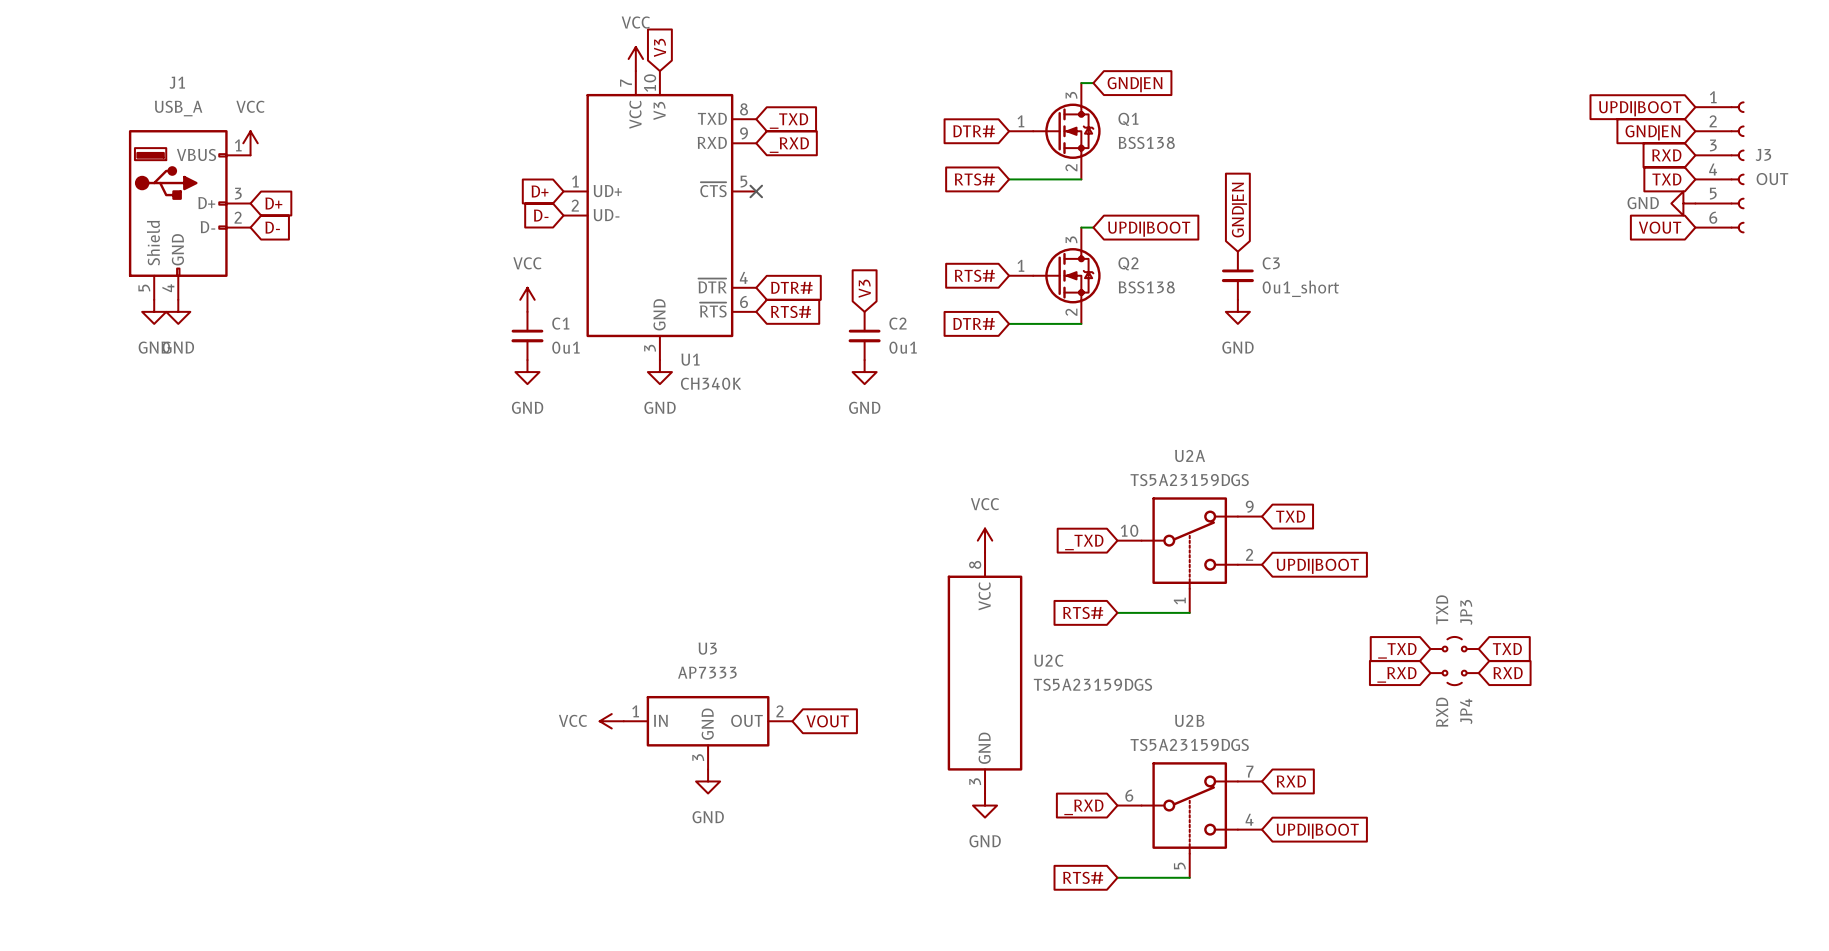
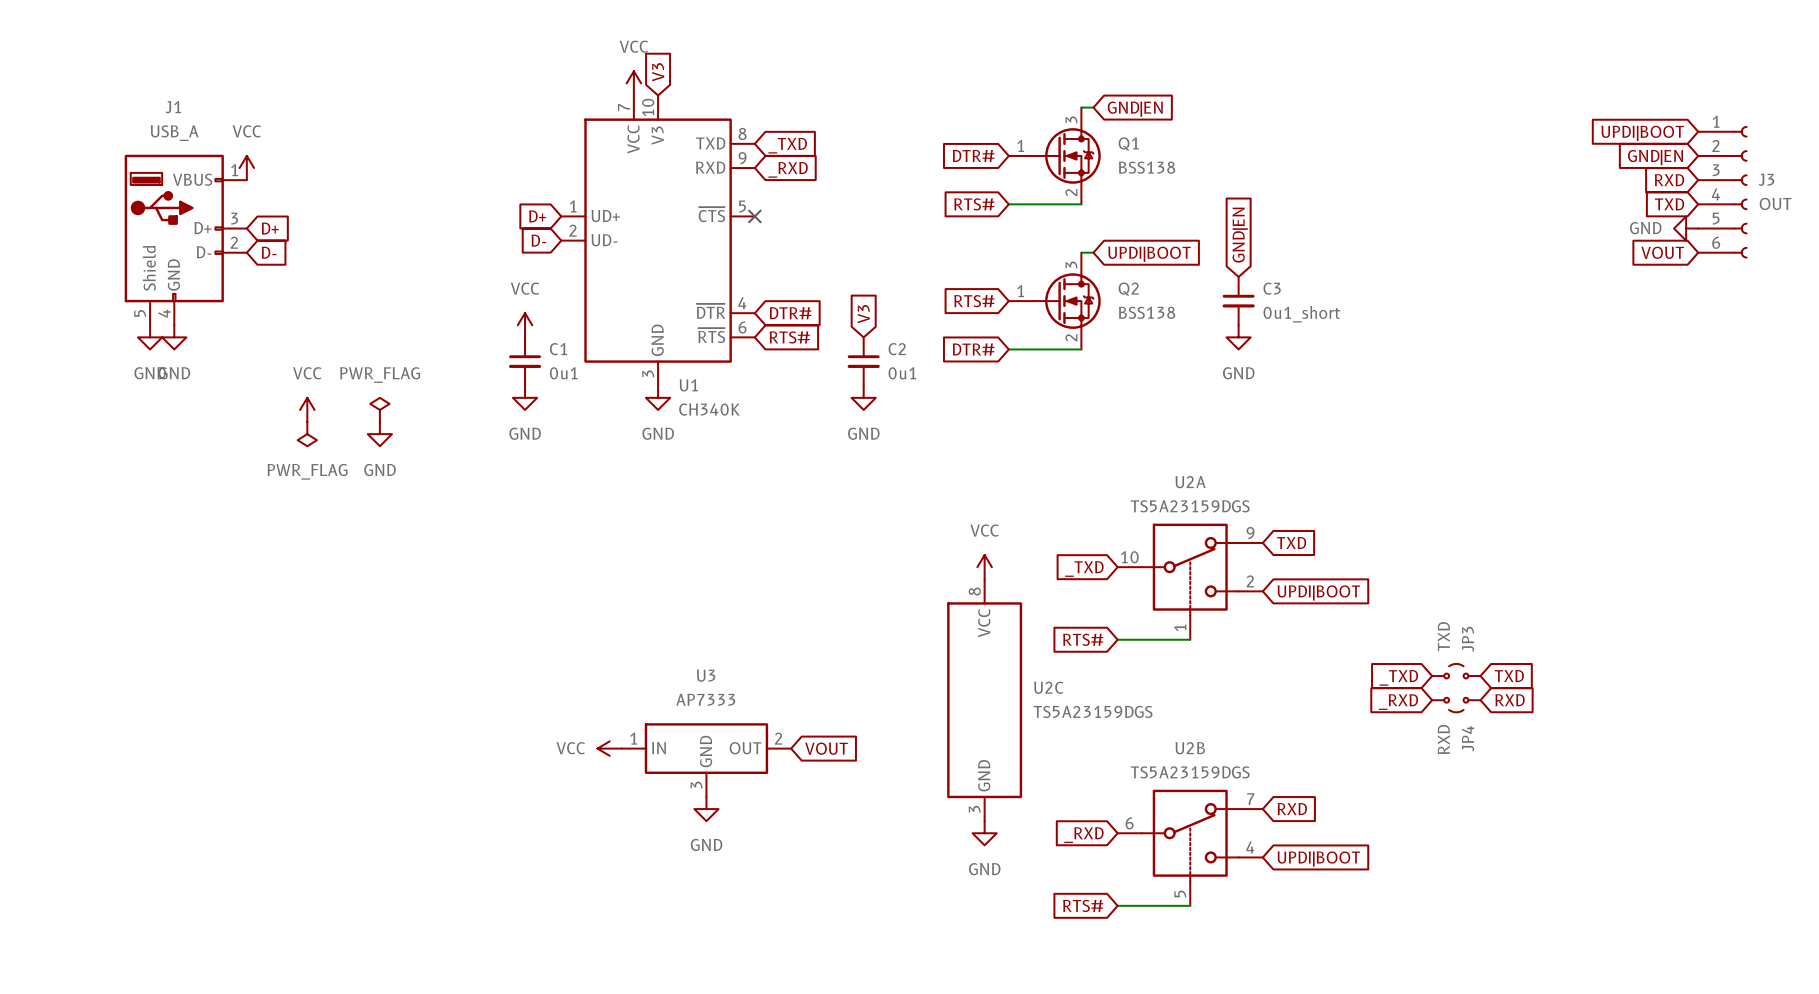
power symbol: none -> VCC (307, 409)
power symbol: none -> PWR_FLAG (379, 409)
power symbol: none -> PWR_FLAG (307, 434)
power symbol: none -> GND (379, 434)

